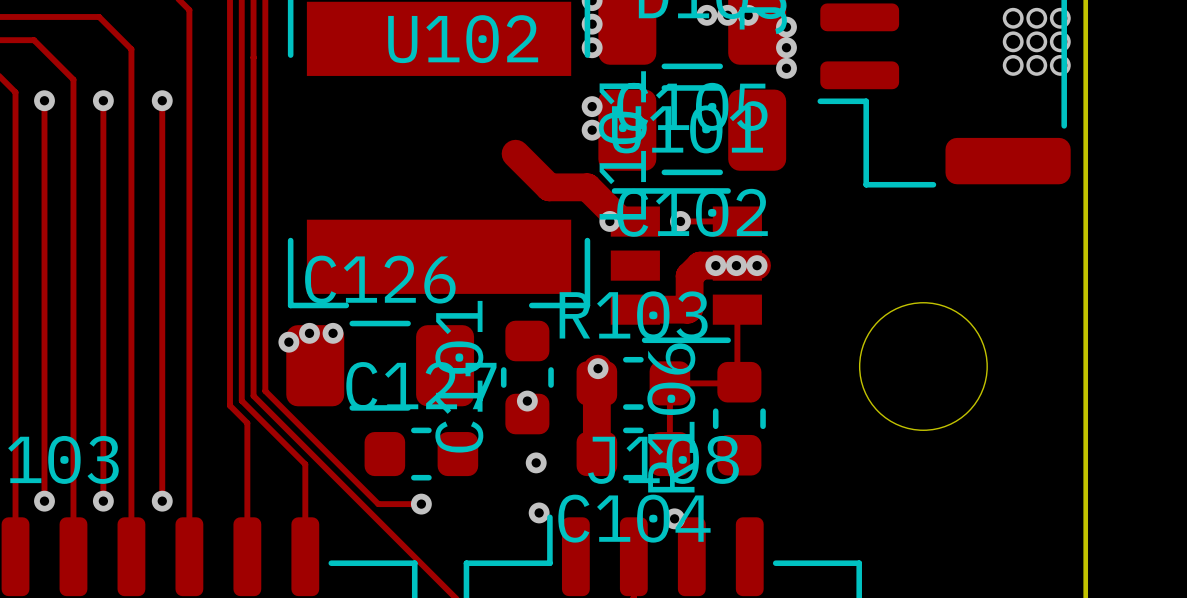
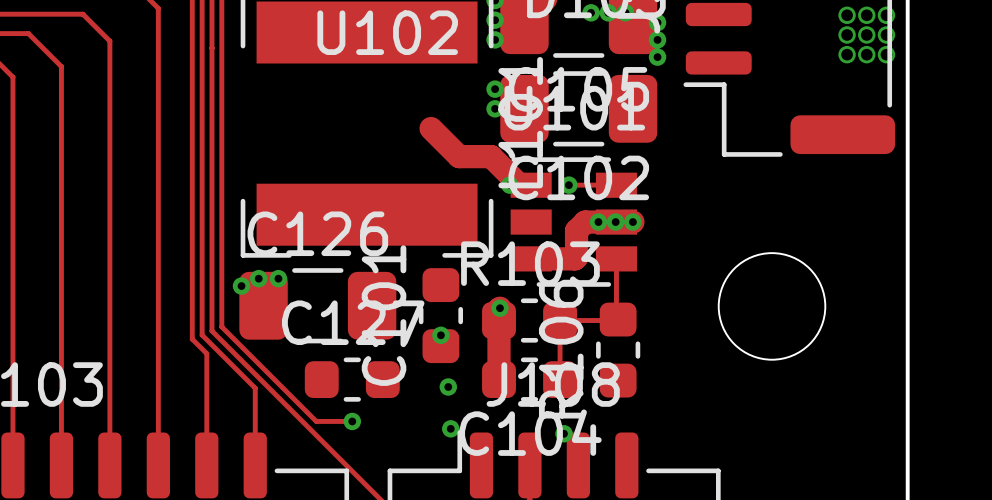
track: (44, 100) (44, 501) -> none
via: (44, 100) -> none
track: (103, 100) (103, 501) -> none
via: (103, 100) -> none
track: (162, 100) (162, 501) -> none
via: (162, 100) -> none
via: (44, 501) -> none
via: (103, 501) -> none
via: (162, 501) -> none

